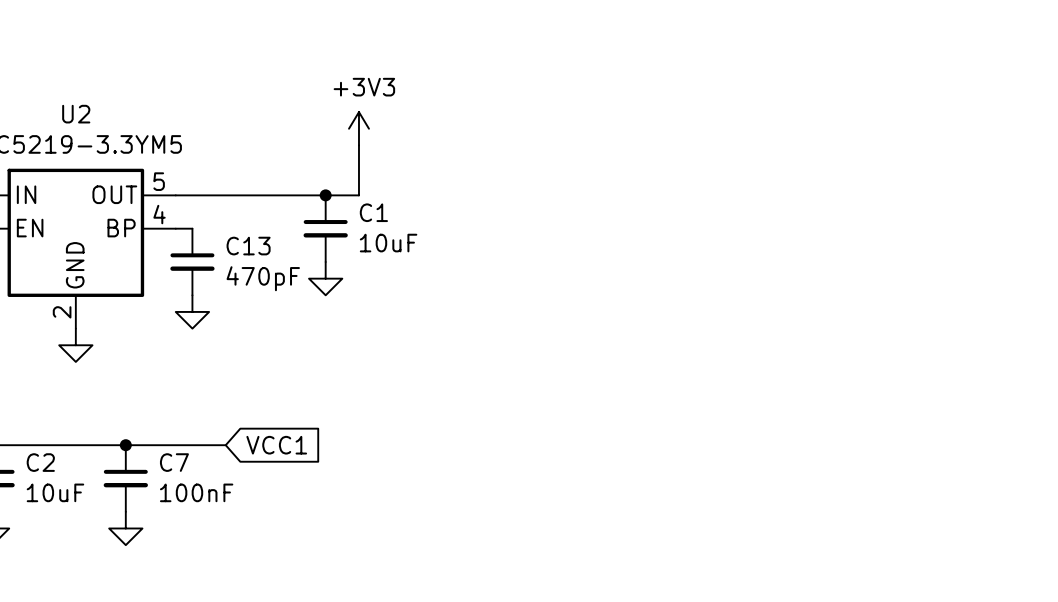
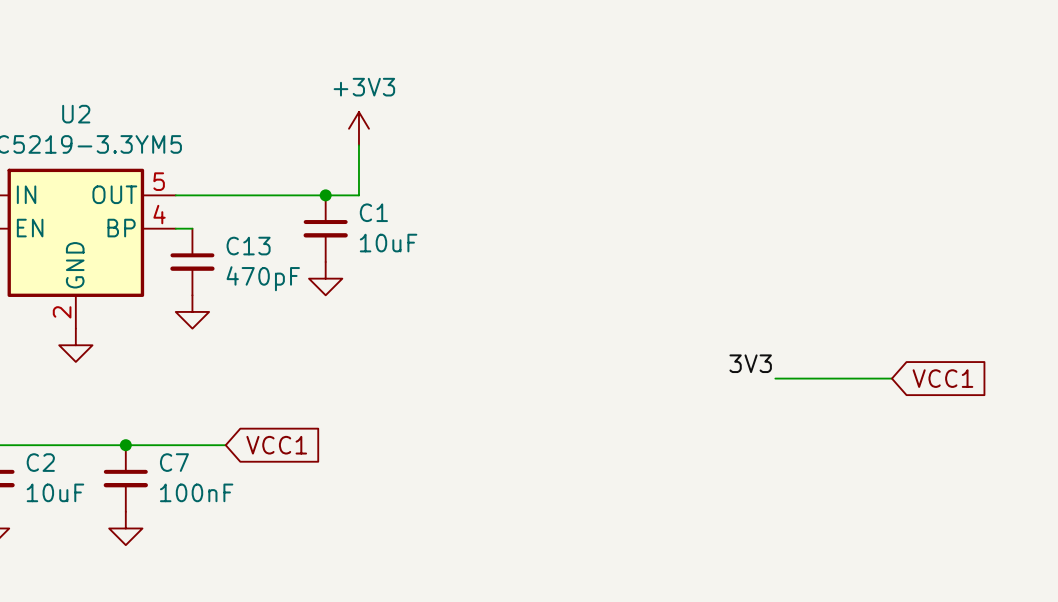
label: none -> 3V3 (750, 363)
wire: none -> (775, 378) (891, 378)
global label: none -> VCC1 (942, 378)

